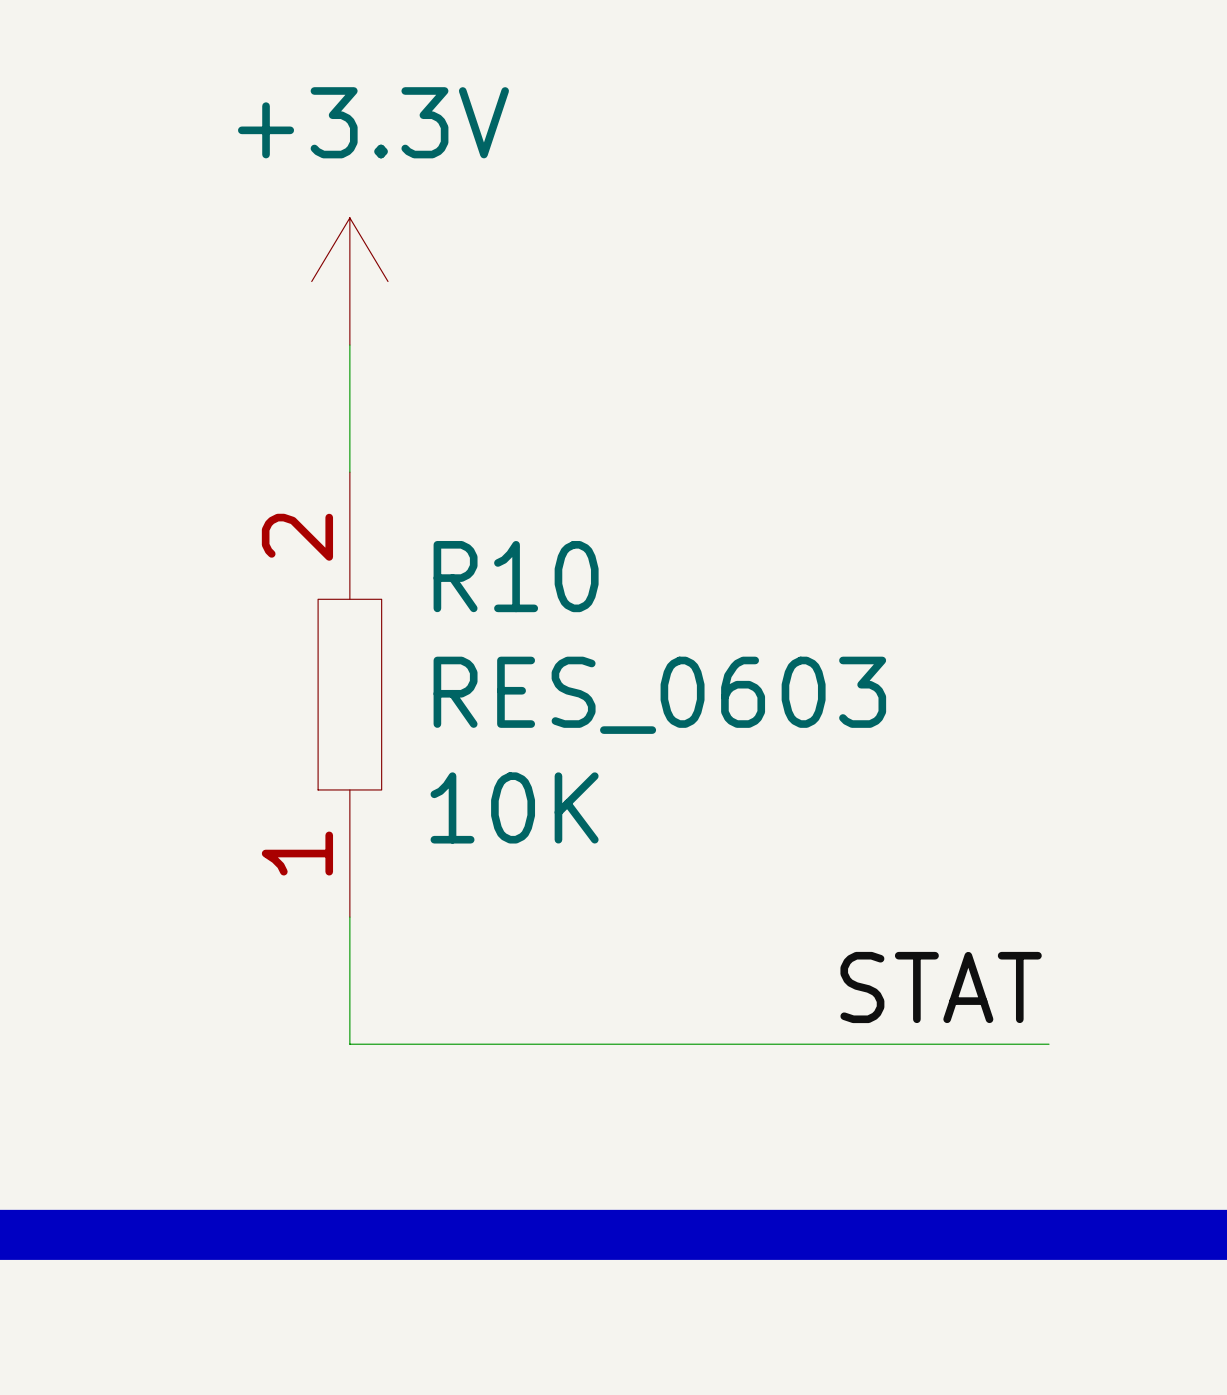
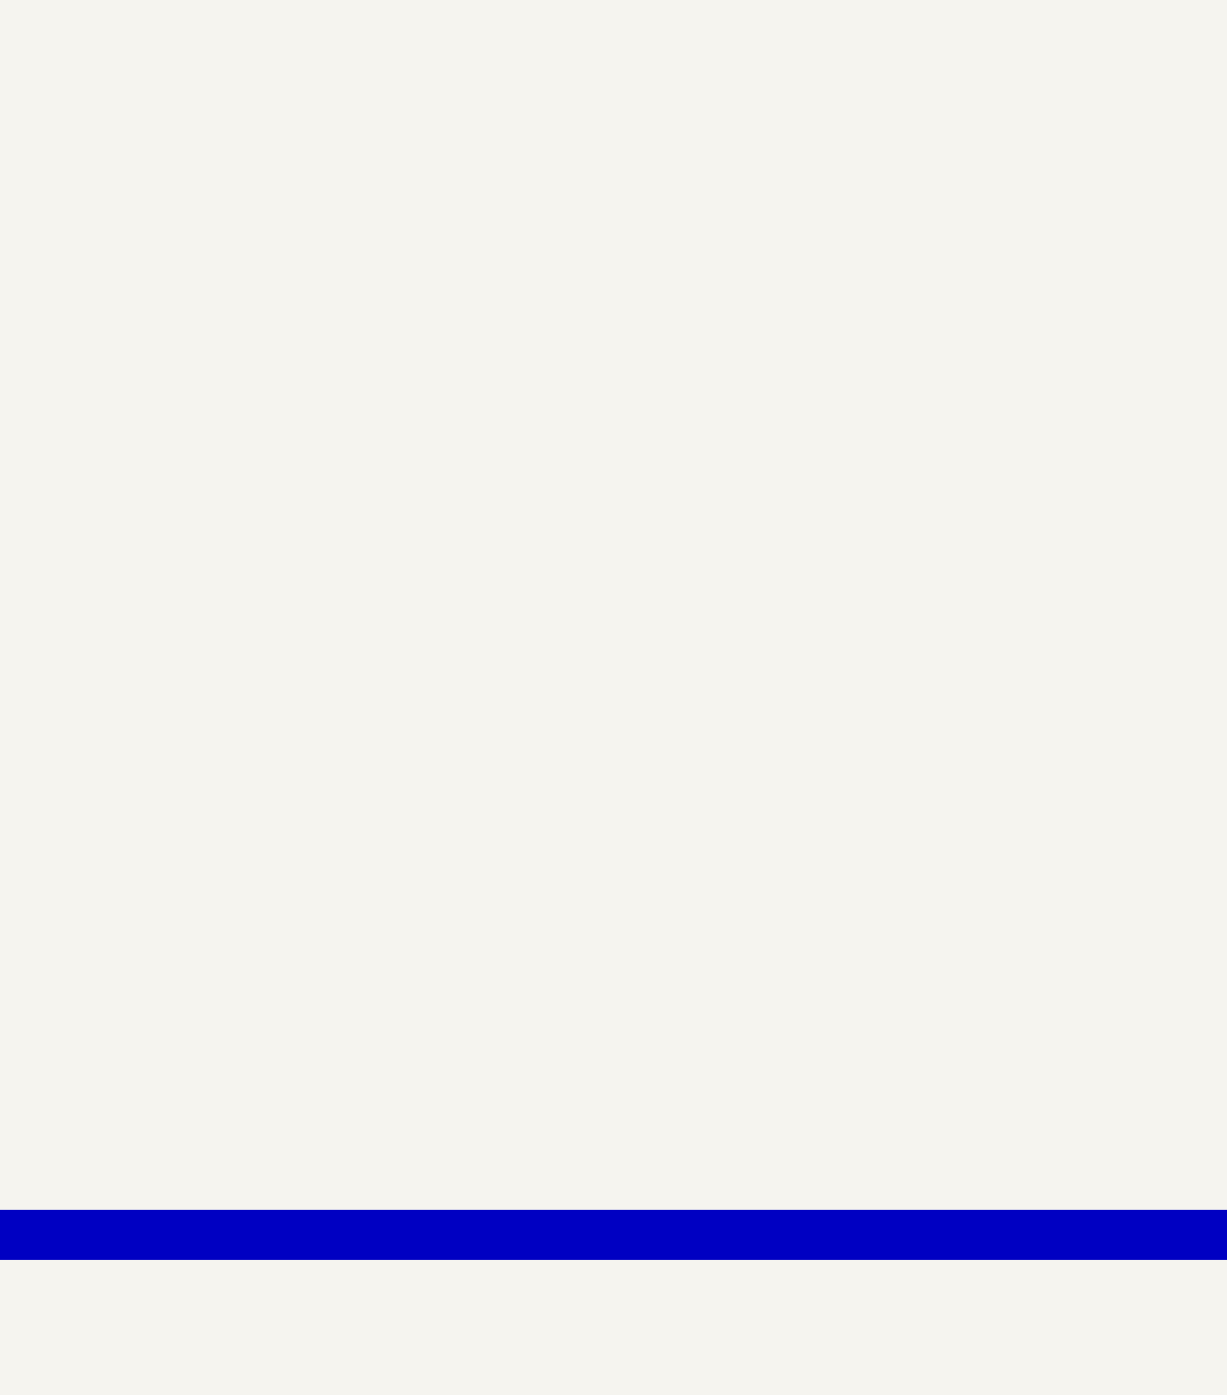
power symbol: +3.3V (349, 281) -> none
wire: (349, 345) (349, 472) -> none
R10: RES_0603 (349, 694) -> none
wire: (349, 917) (349, 1044) (1049, 1044) -> none
label: STAT (941, 987) -> none

